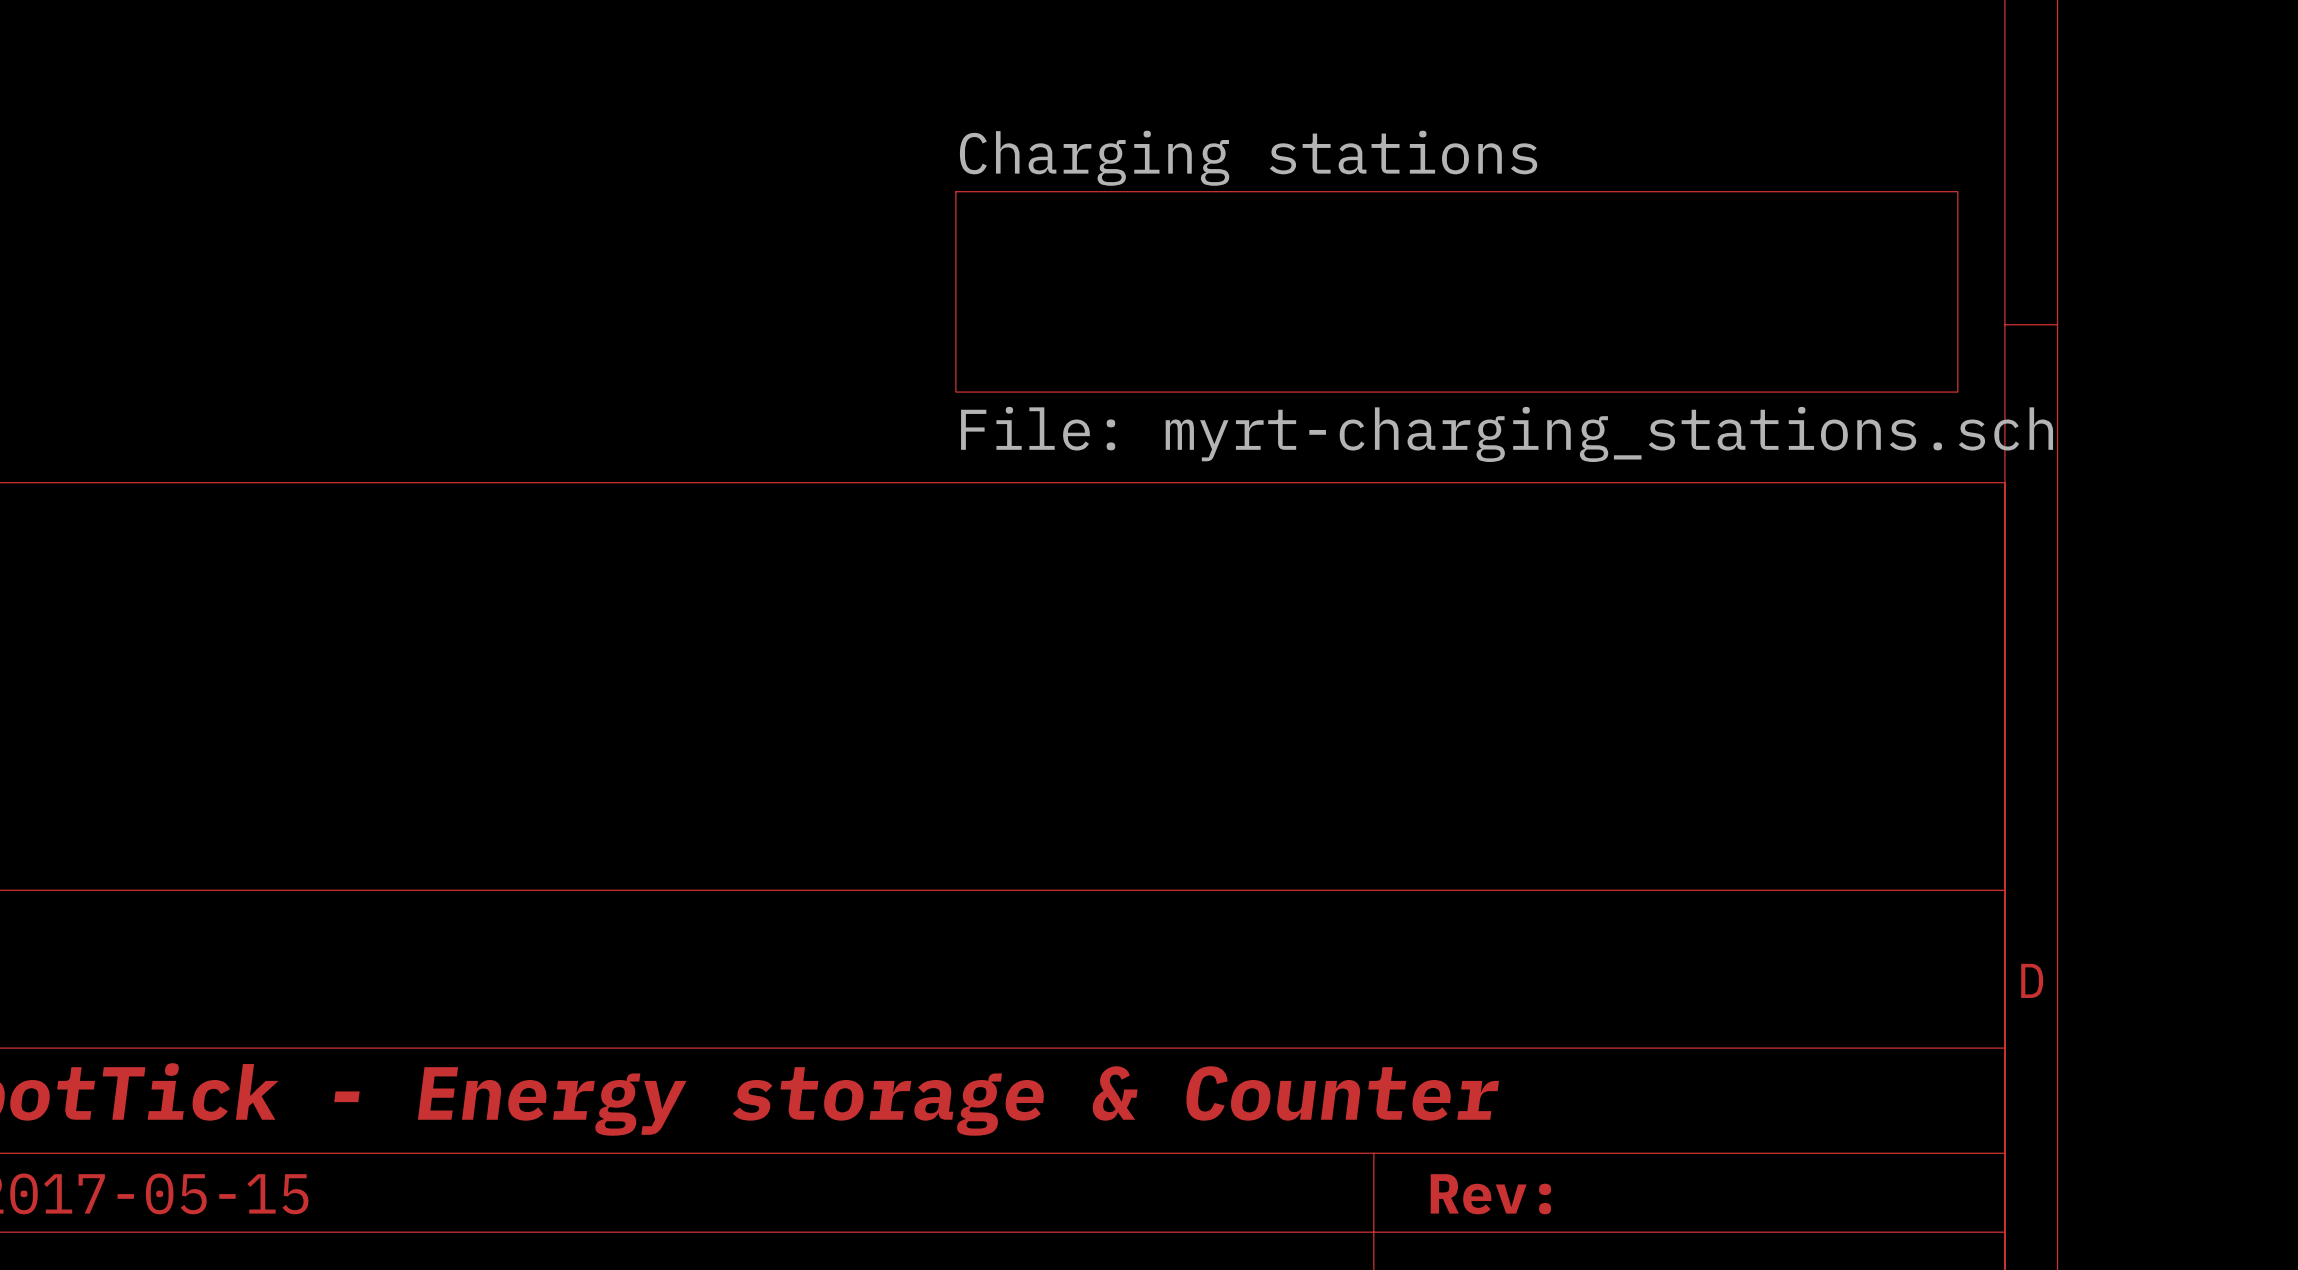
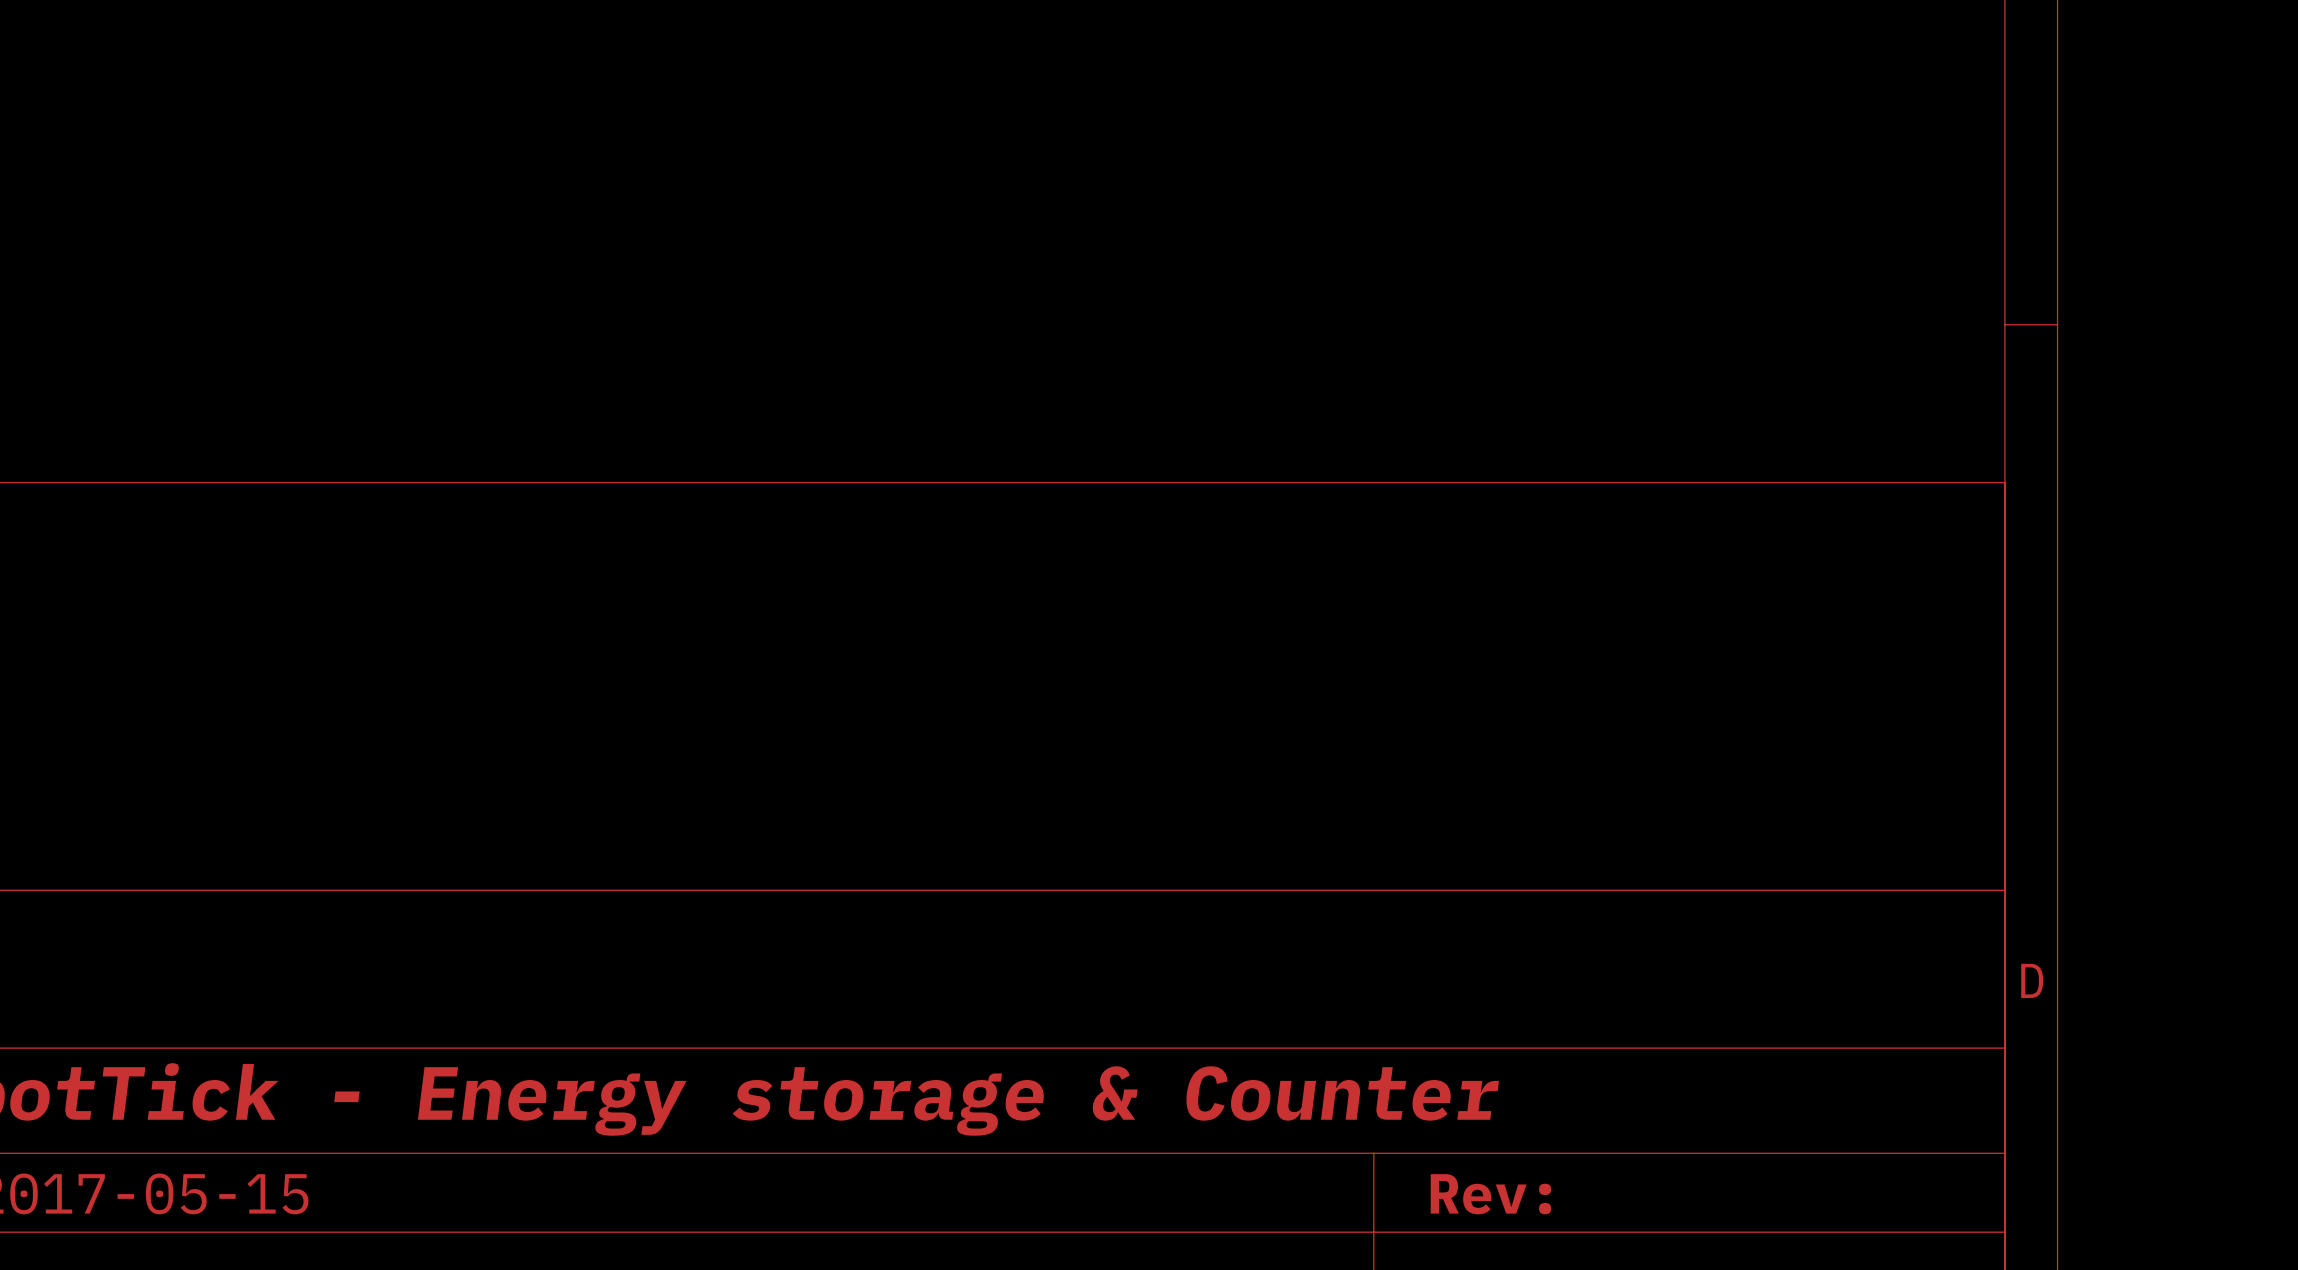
sheet Charging stations: File: myrt-charging_stations.sch (1456, 291) -> none

